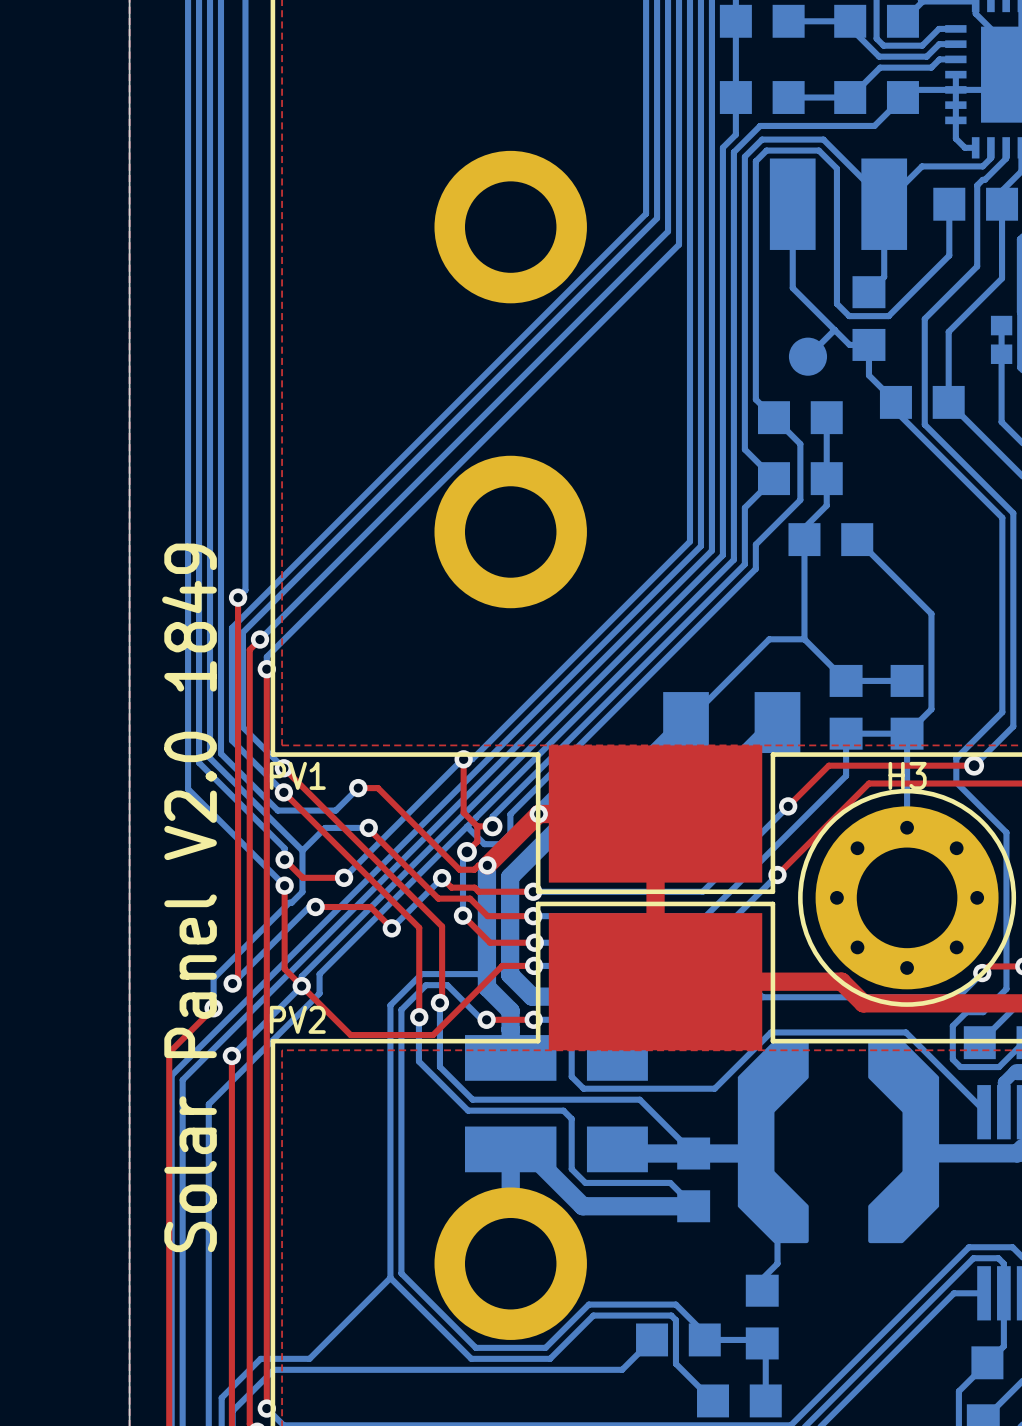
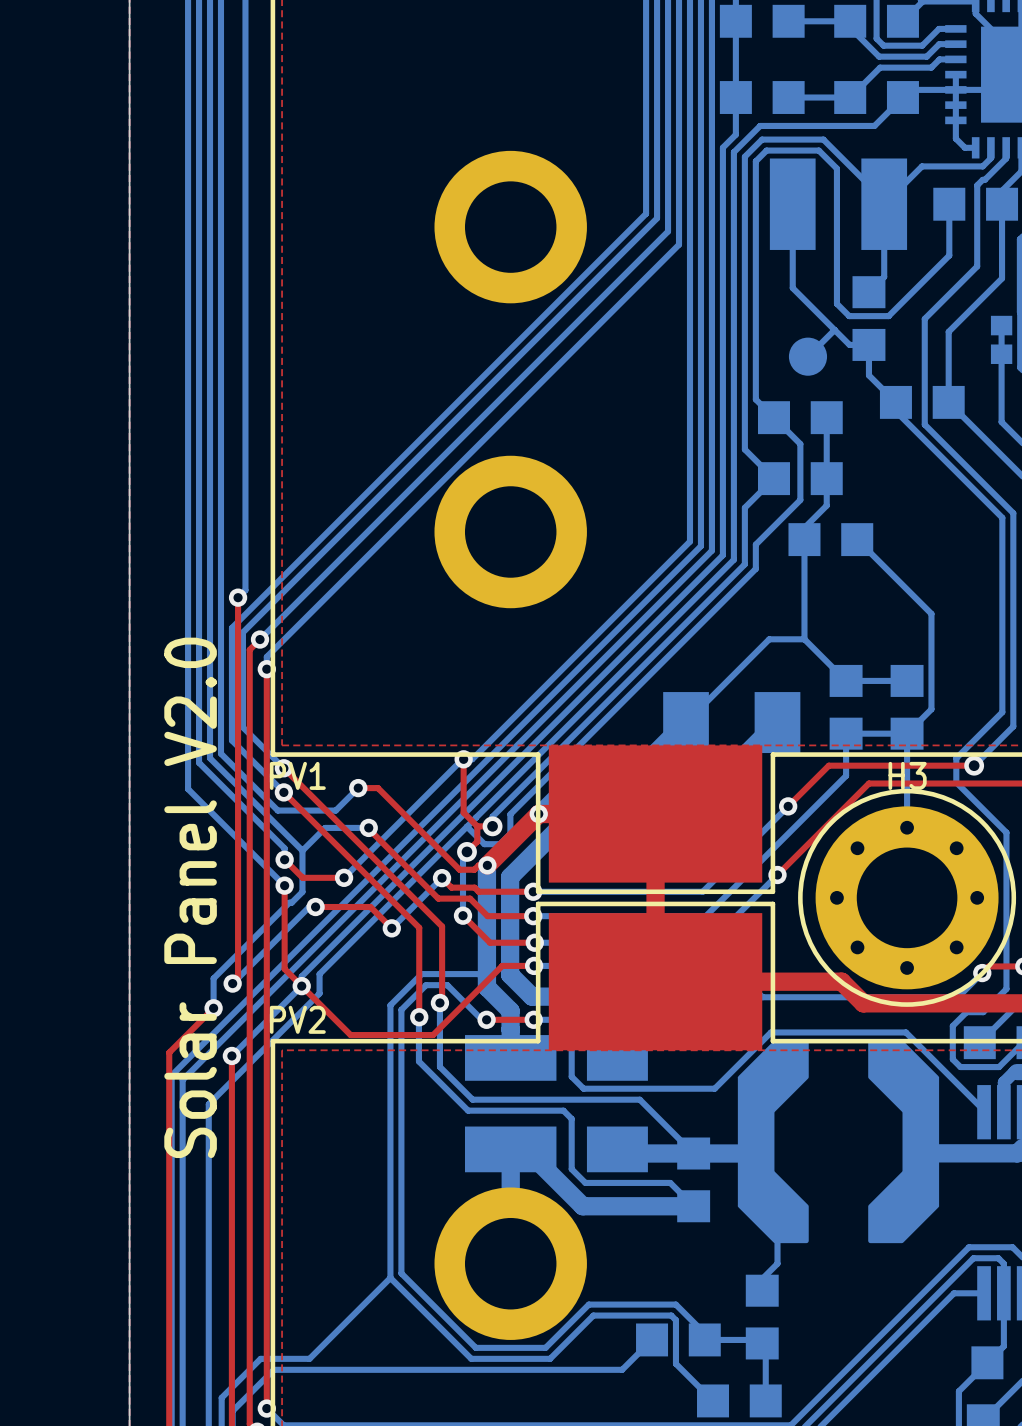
text: Solar Panel V2.0 1849 (189, 897) -> Solar Panel V2.0 (190, 897)

